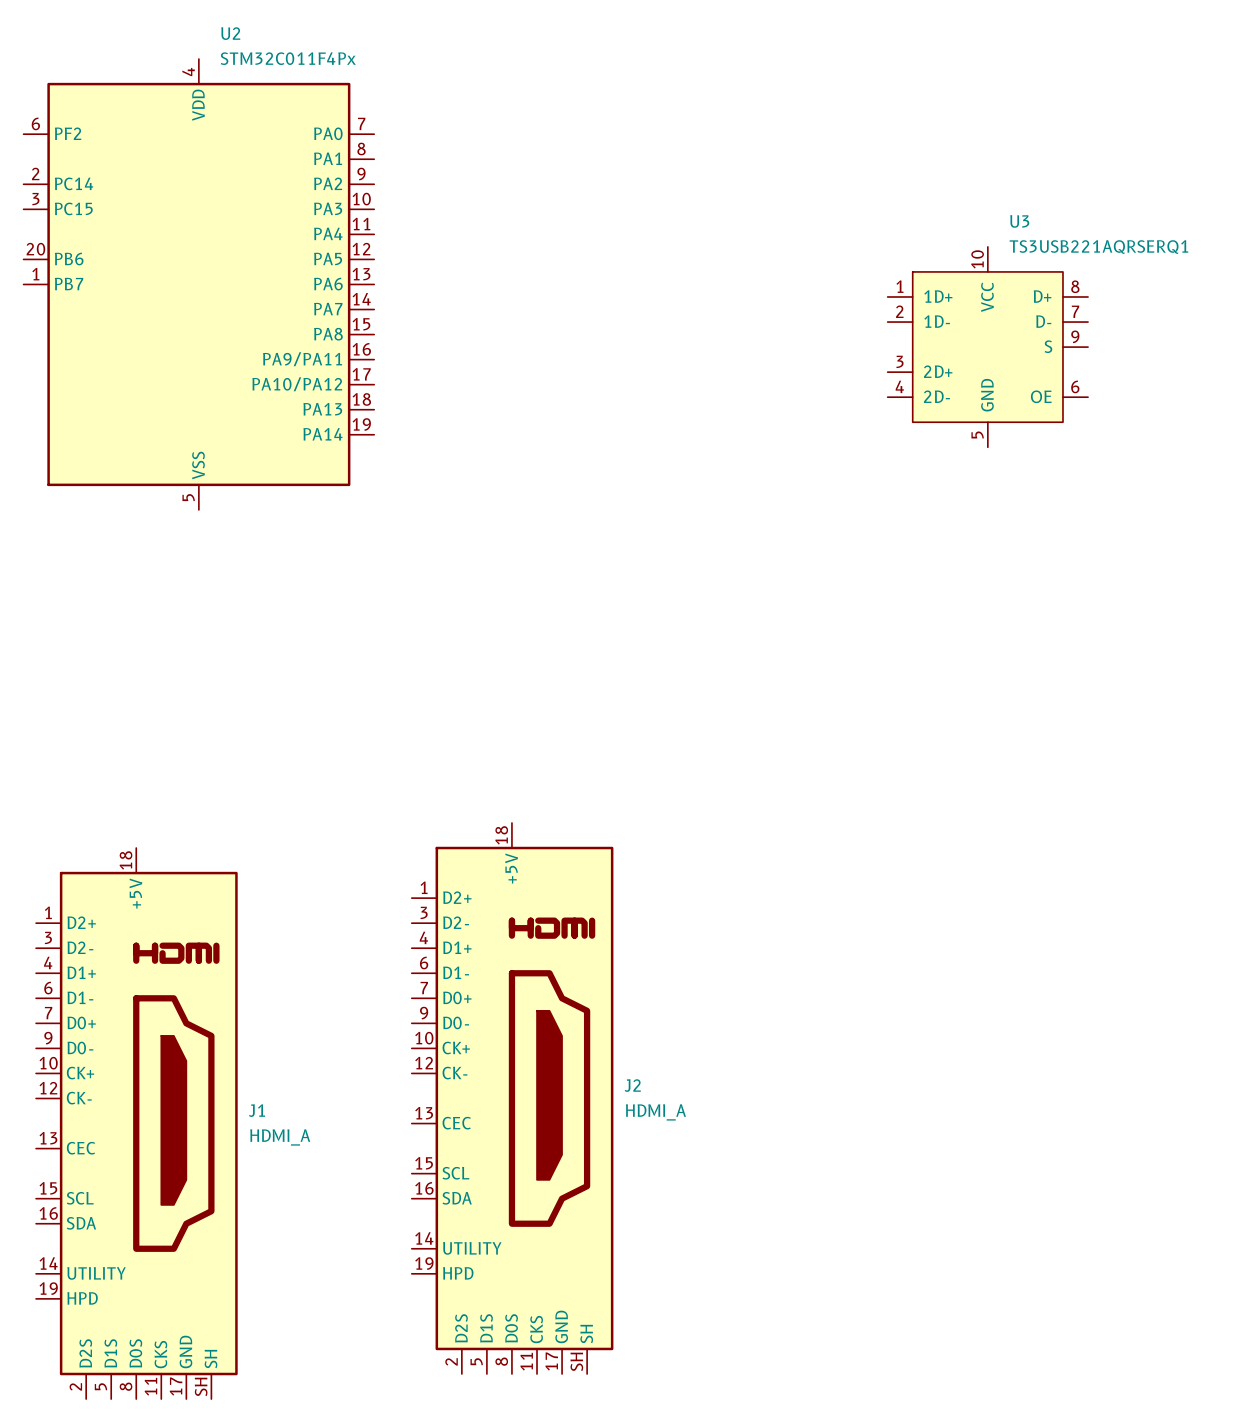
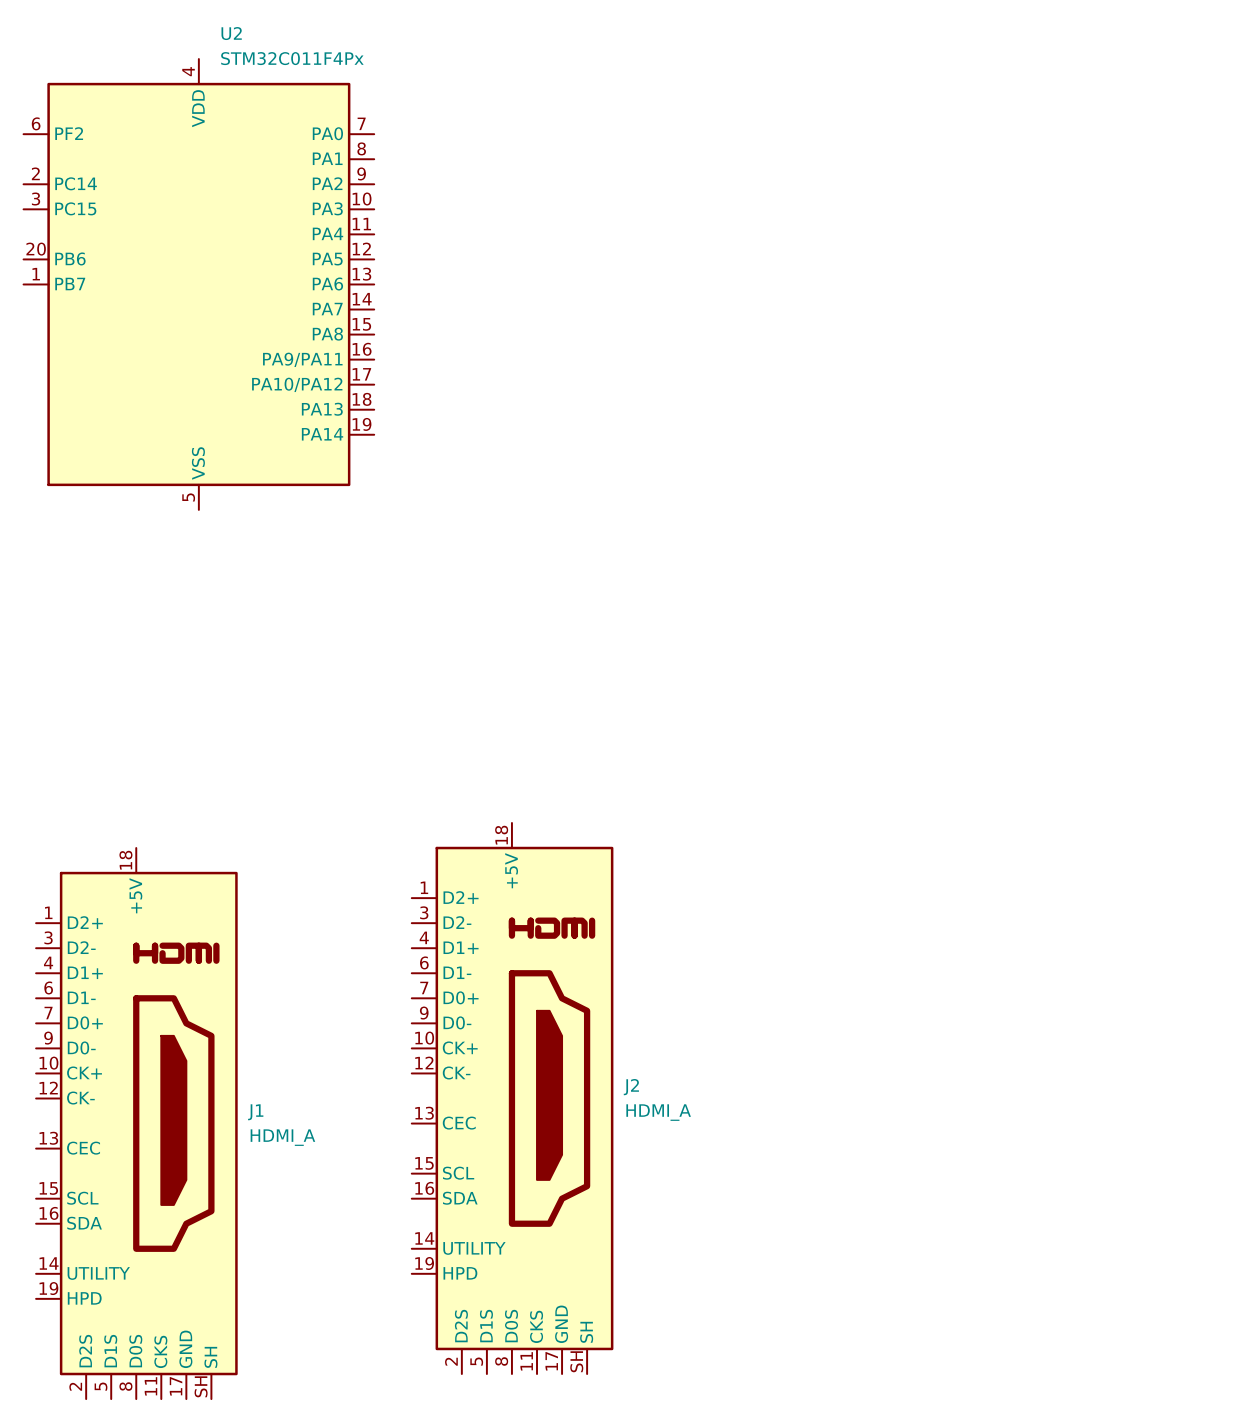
U3: TS3USB221AQRSERQ1 (987, 347) -> none

